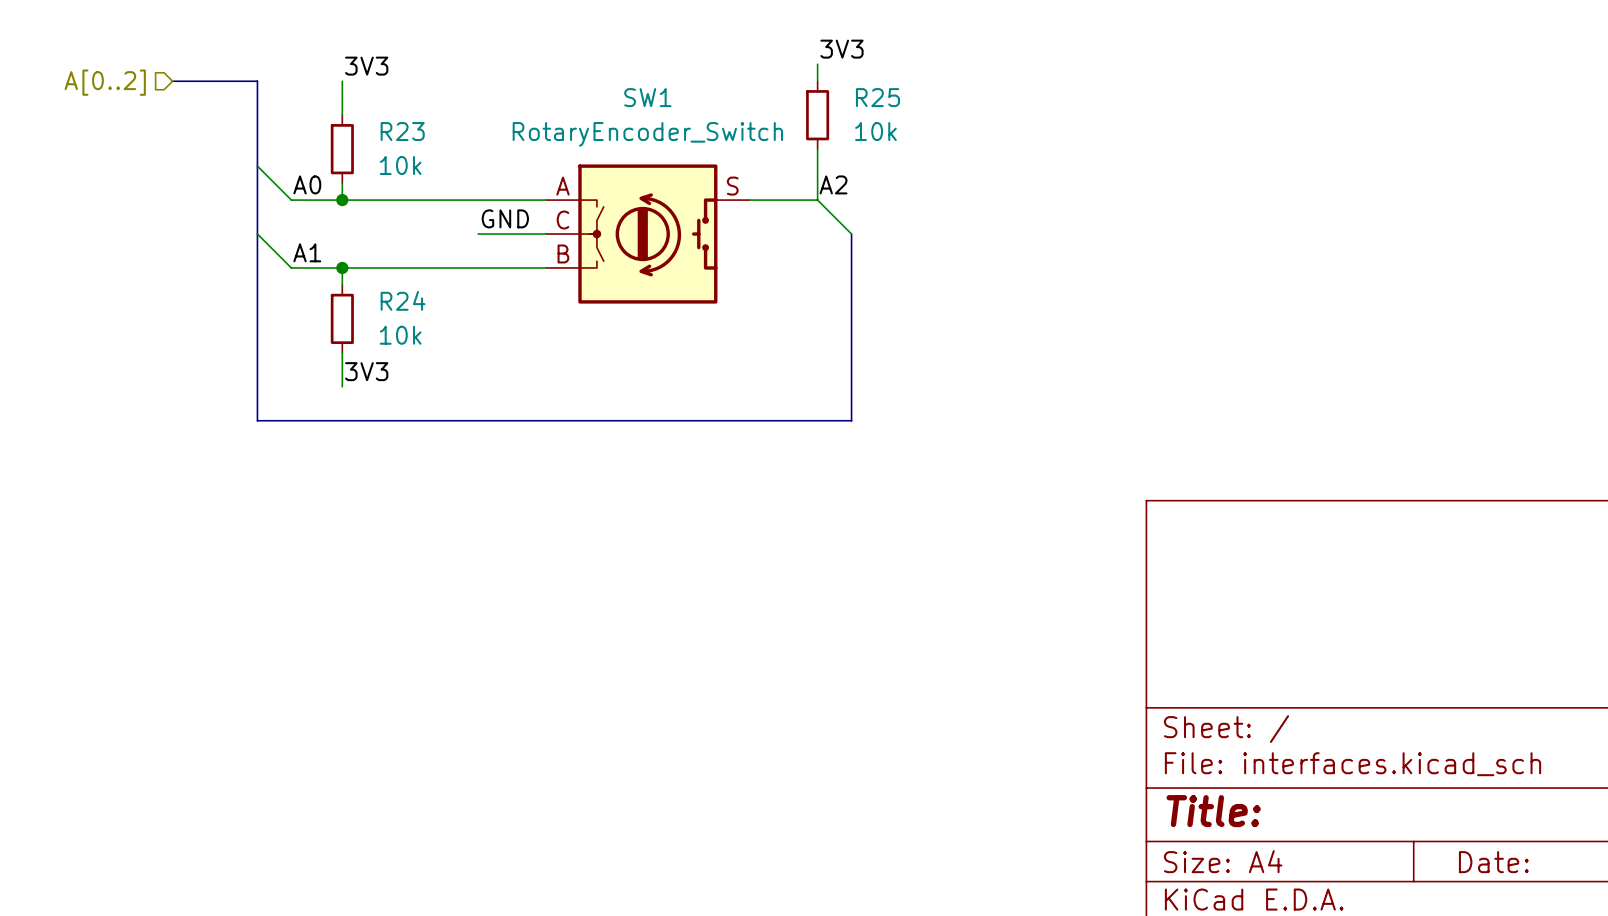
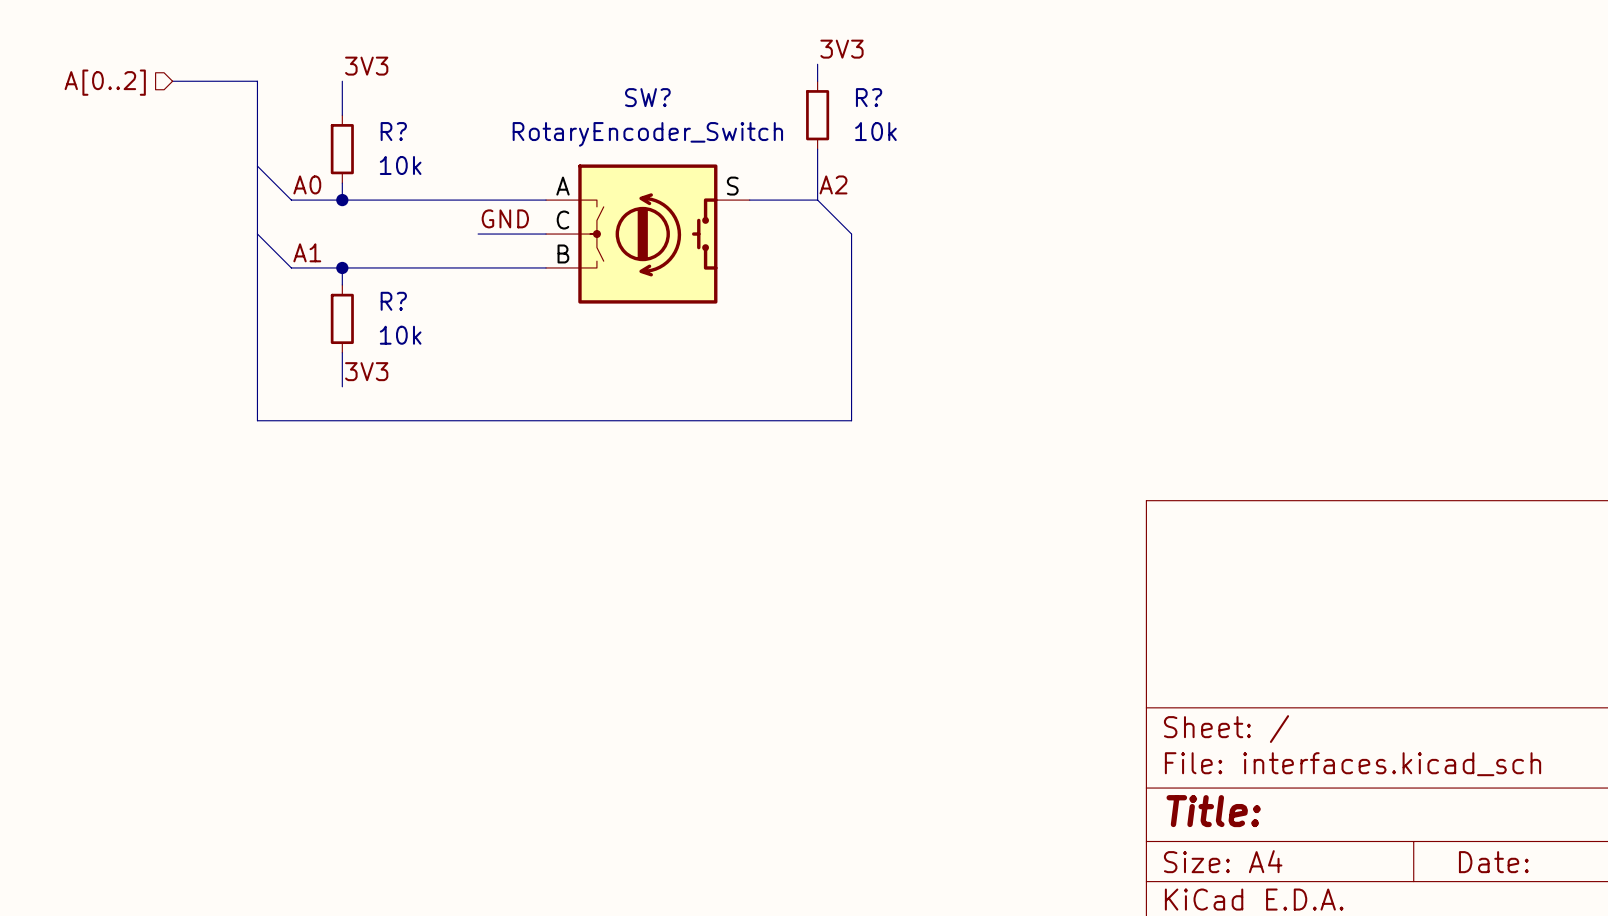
SW1 name: SW1 (647, 97) -> SW? (647, 97)
R25 name: R25 (877, 97) -> R? (869, 97)
R23 name: R23 (402, 131) -> R? (393, 131)
R24 name: R24 (403, 300) -> R? (393, 301)

